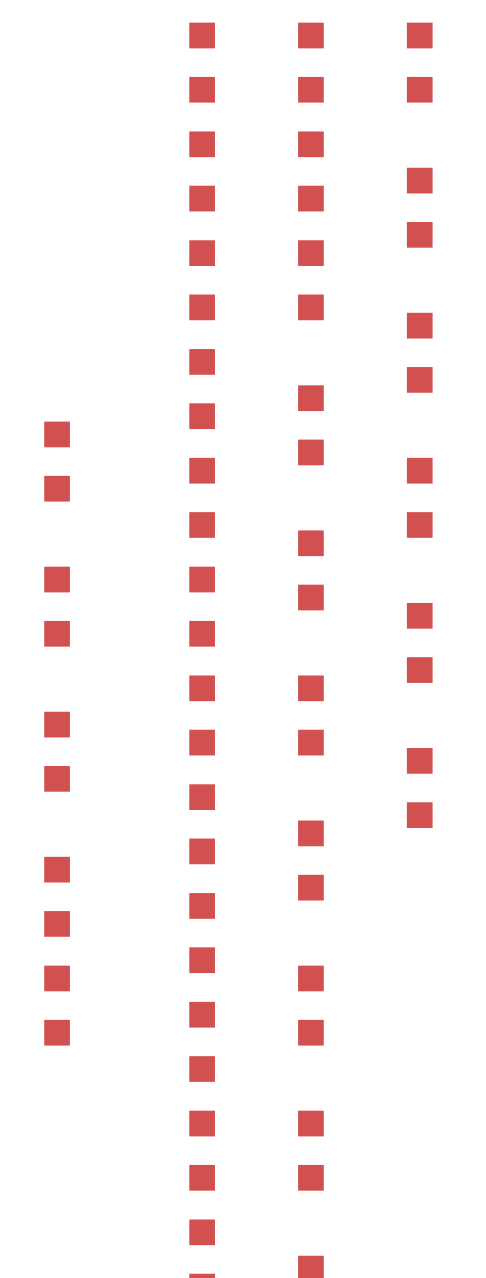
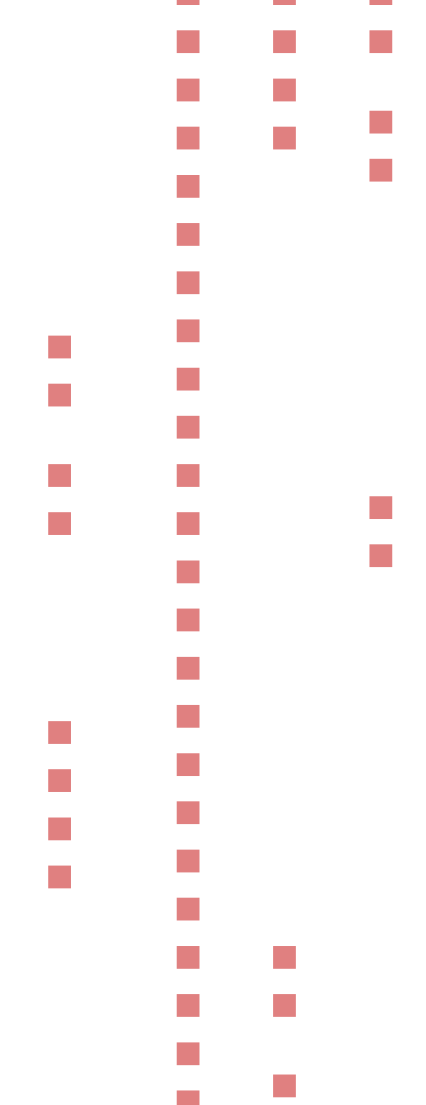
part: (310, 280) -> none
part: (419, 352) -> none
part: (310, 425) -> none
part: (419, 497) -> none
part: (310, 570) -> none
part: (310, 715) -> none
part: (57, 751) -> none
part: (419, 788) -> none
part: (310, 860) -> none
part: (310, 1005) -> none

